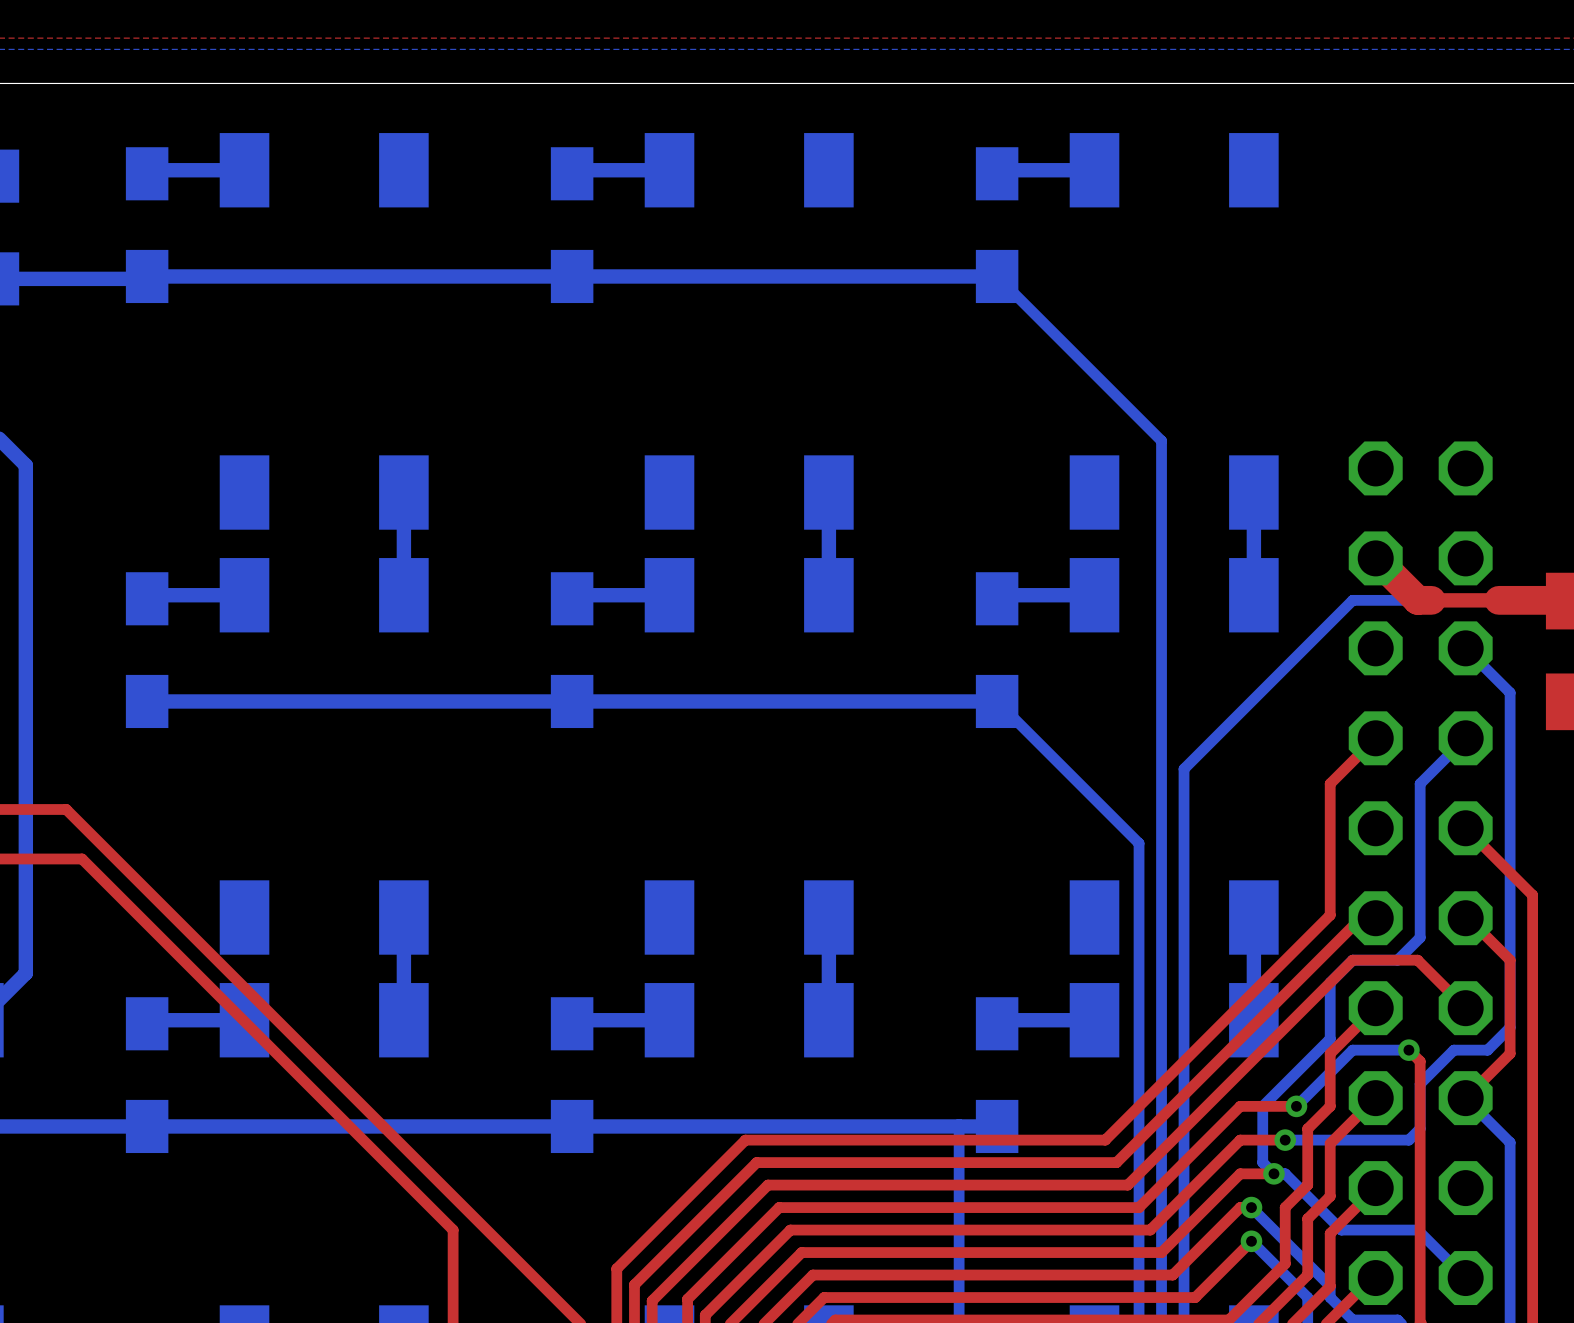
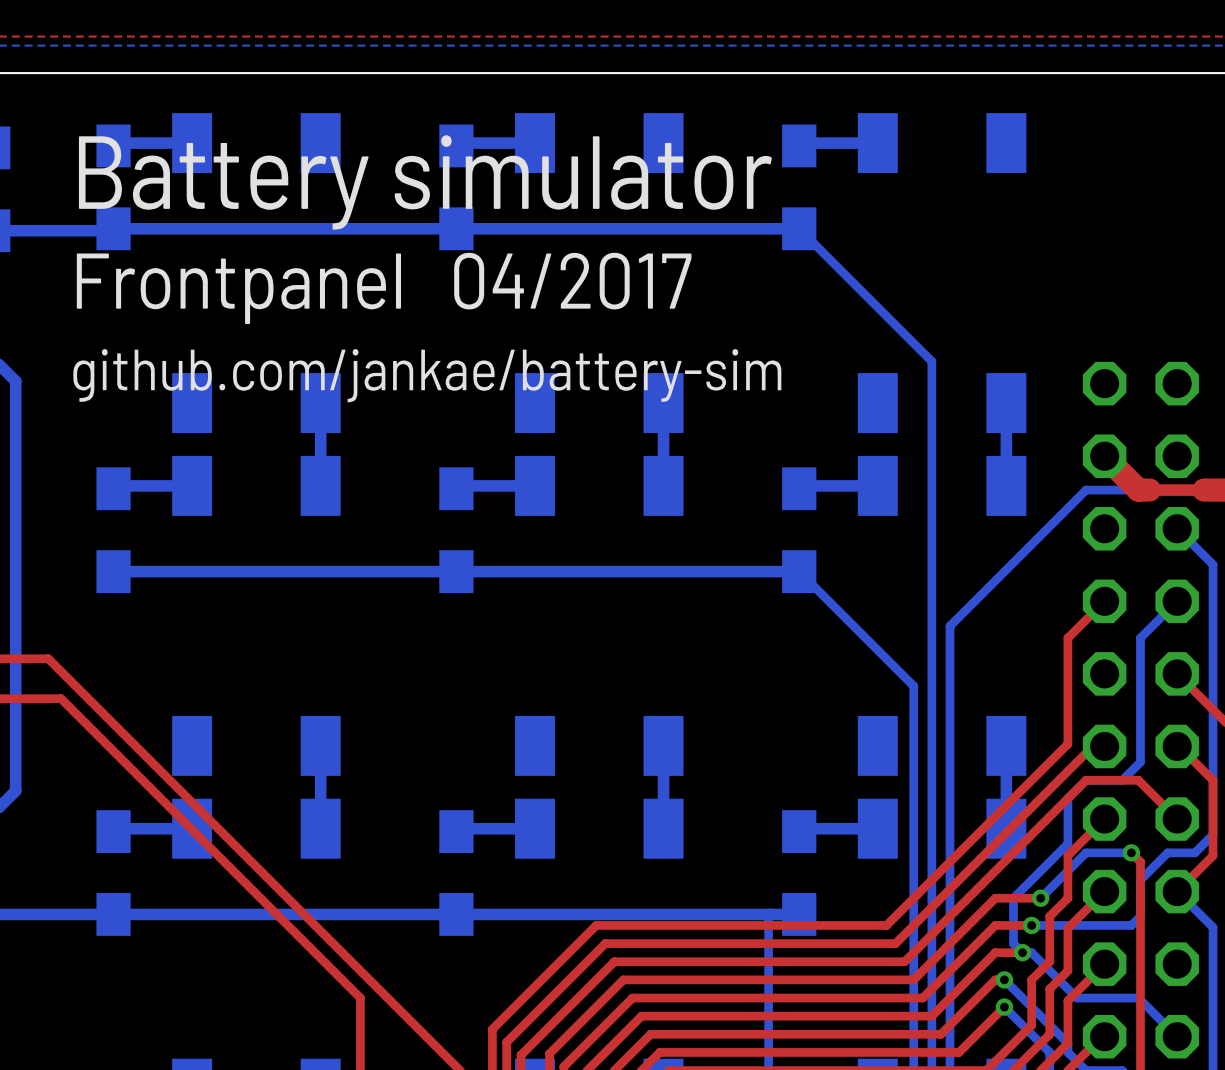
text: none -> Battery simulator (425, 182)
text: none -> Frontpanel 04/2017 (384, 288)
text: none -> github.com/jankae/battery-sim (427, 375)

